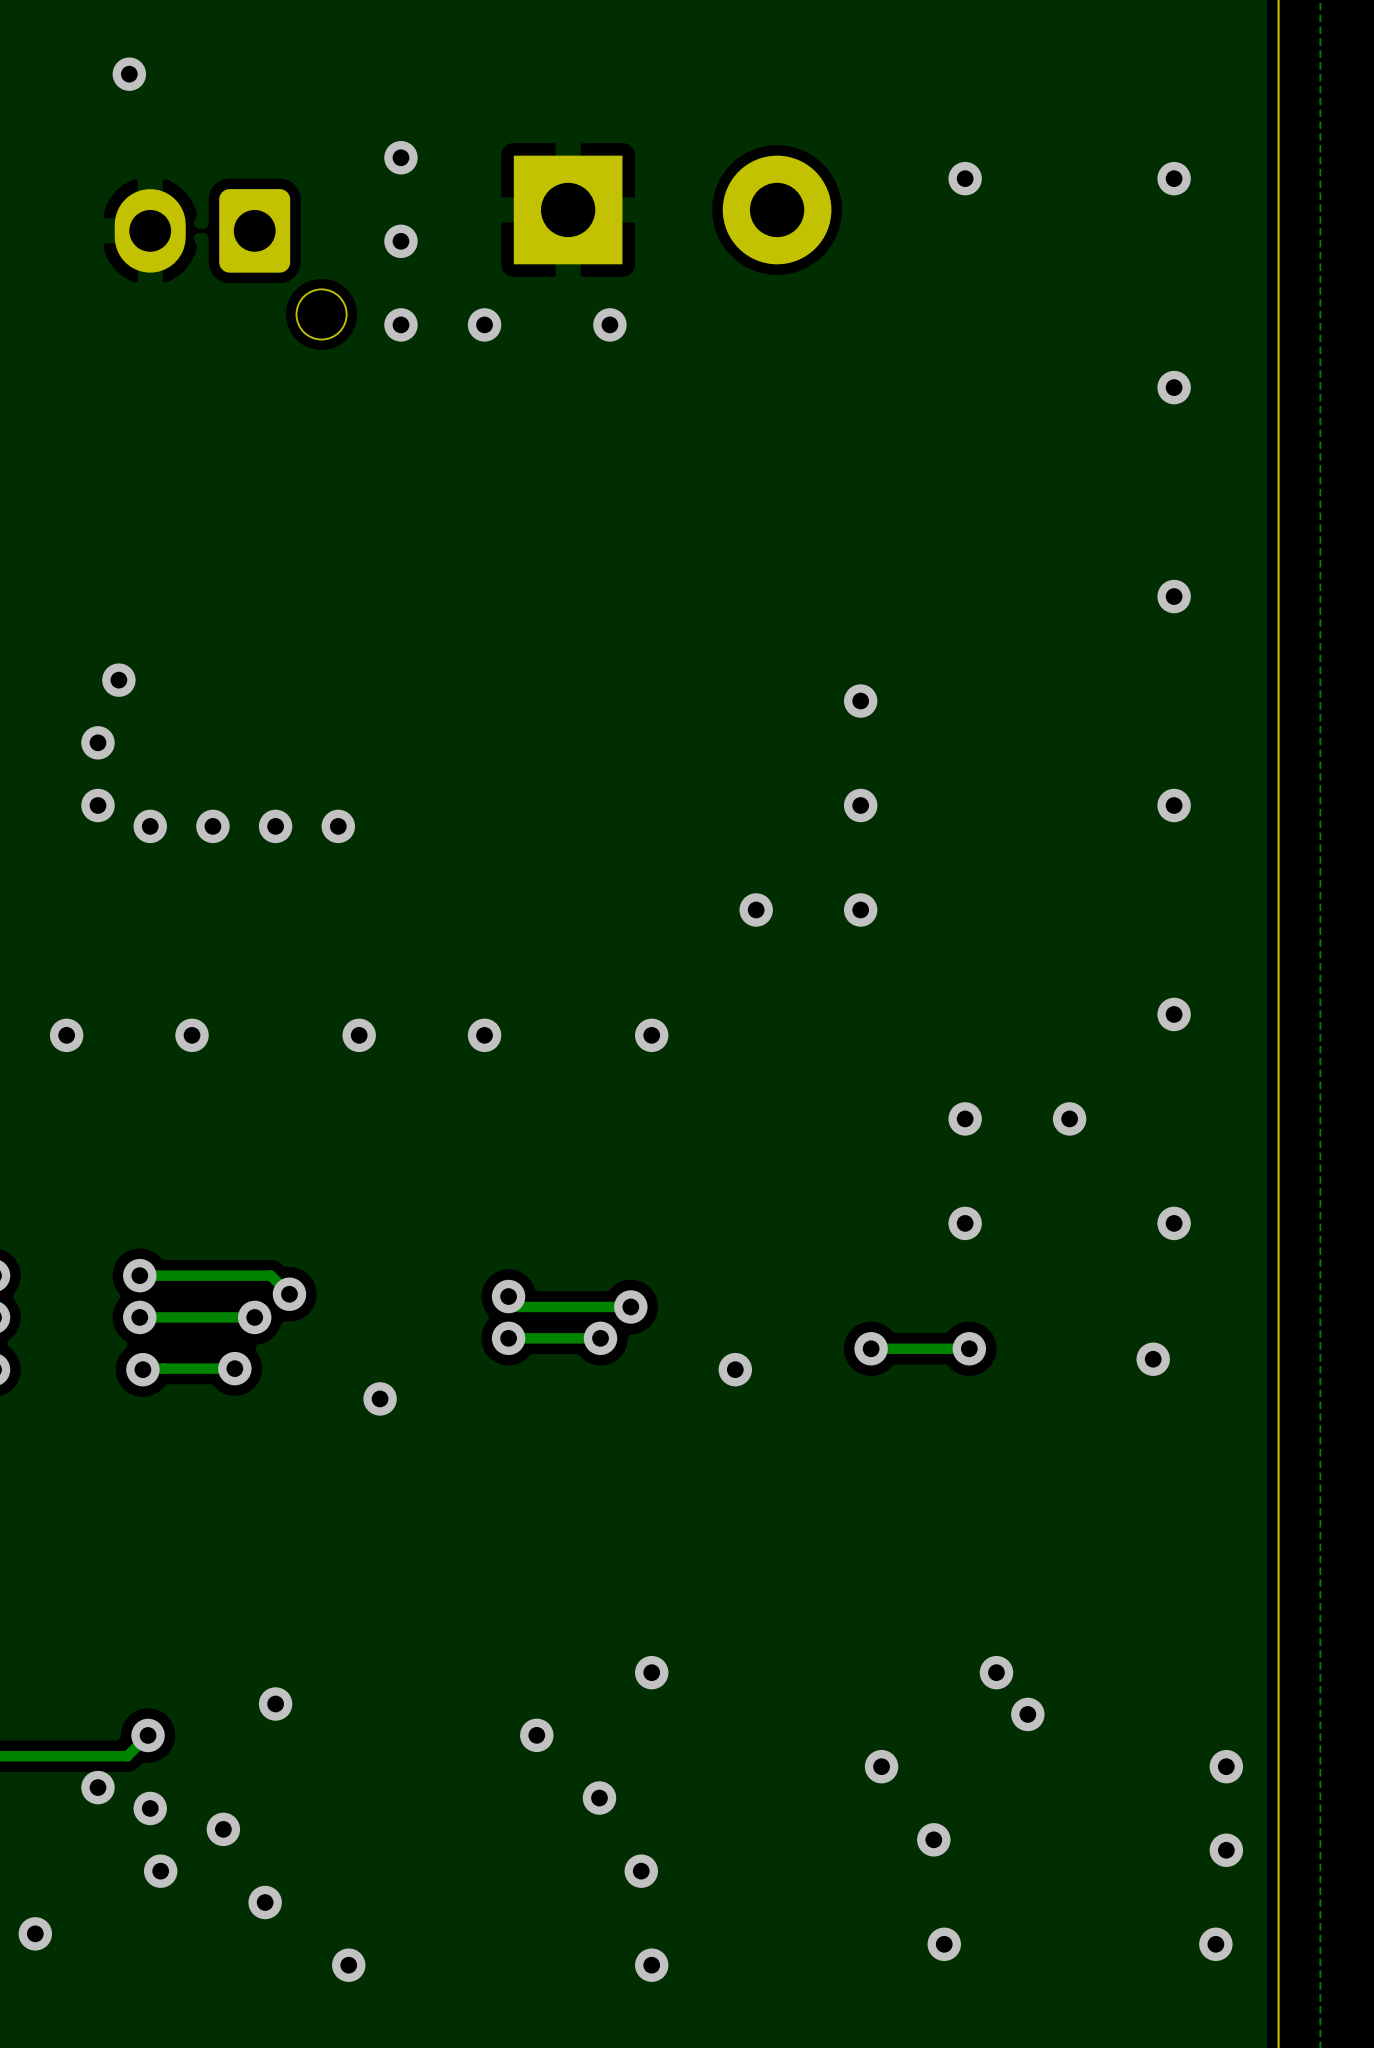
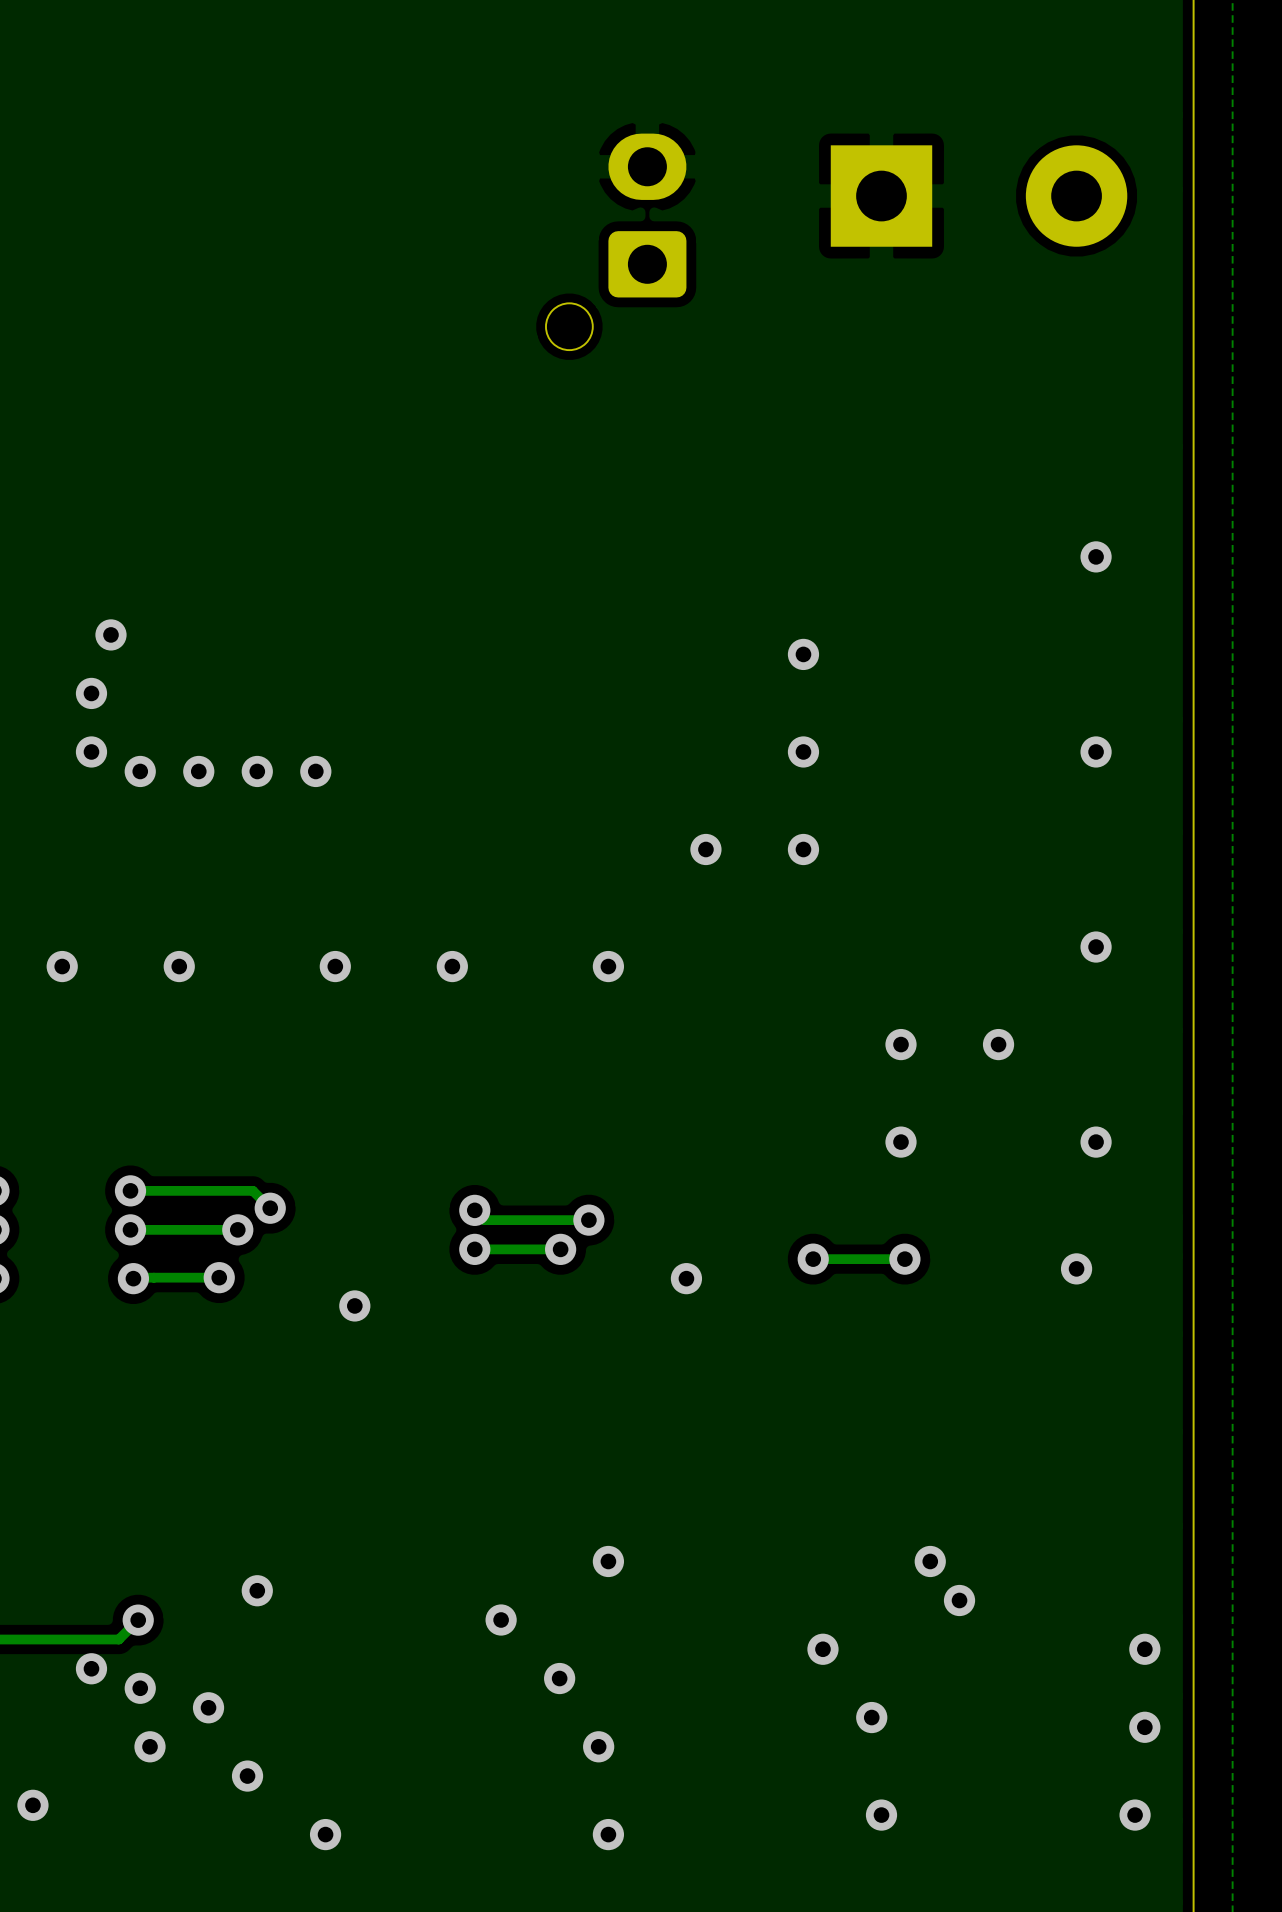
via: (129, 74) -> none
via: (400, 157) -> none
via: (965, 178) -> none
via: (1174, 178) -> none
part position: (672, 209) -> (979, 196)
via: (400, 241) -> none
part rotation: 0° (230, 264) -> 90° clockwise (616, 241)
part position: (230, 264) -> (616, 241)
via: (400, 324) -> none
via: (484, 324) -> none
via: (609, 324) -> none
via: (1174, 387) -> none

